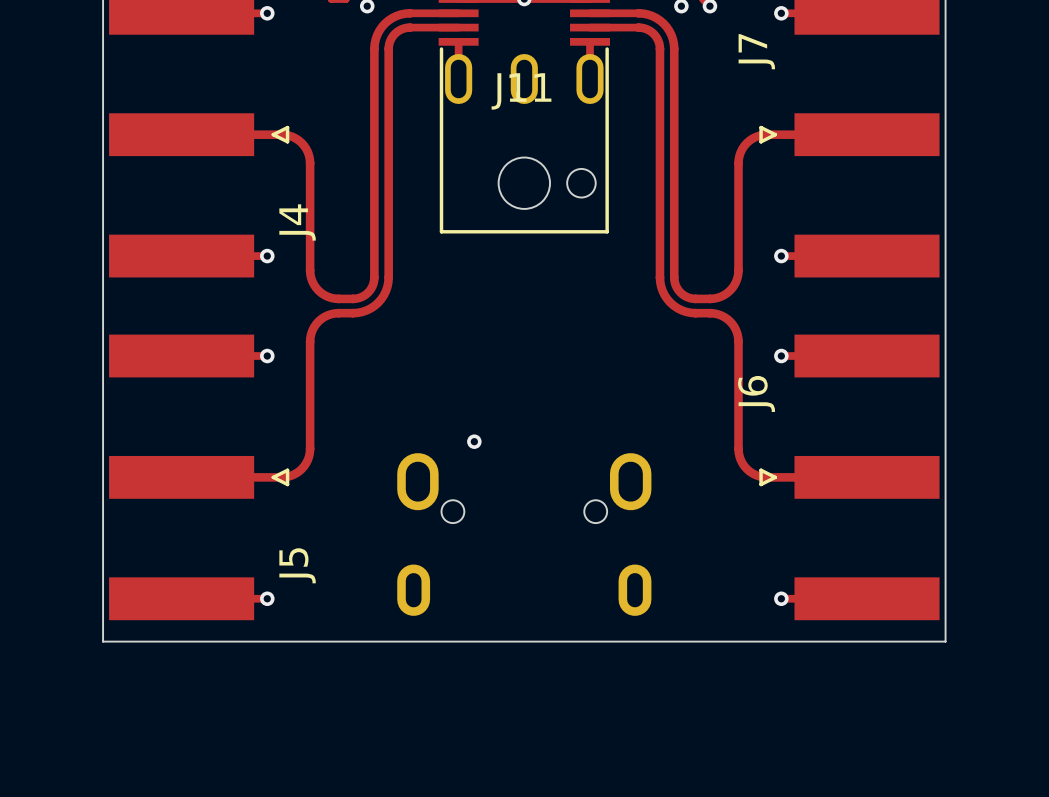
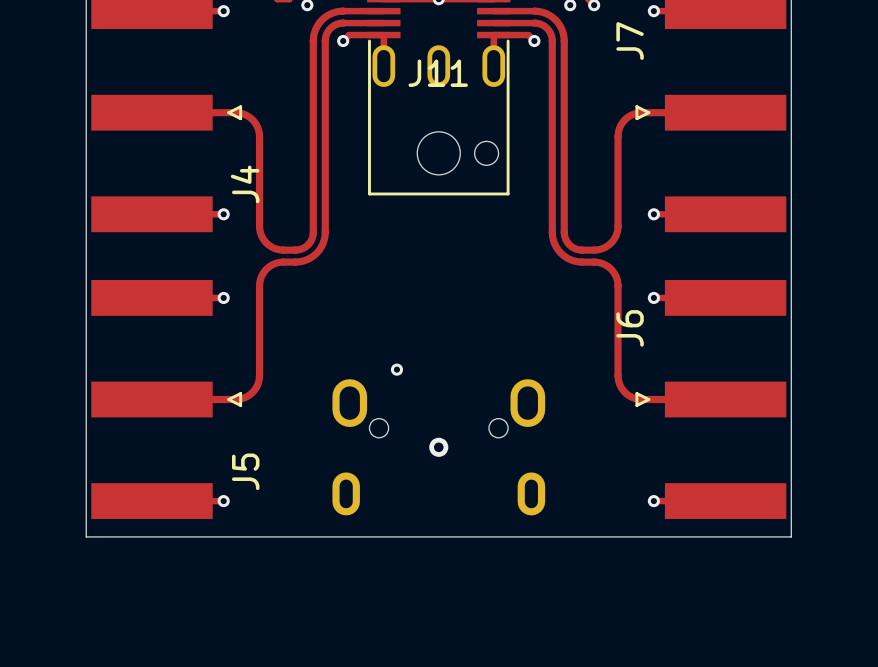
track: none -> (383, 35) (349, 35) (343, 41)
track: none -> (493, 35) (528, 35) (534, 41)
via: none -> (343, 41)
via: none -> (534, 41)
via: none -> (438, 447)

